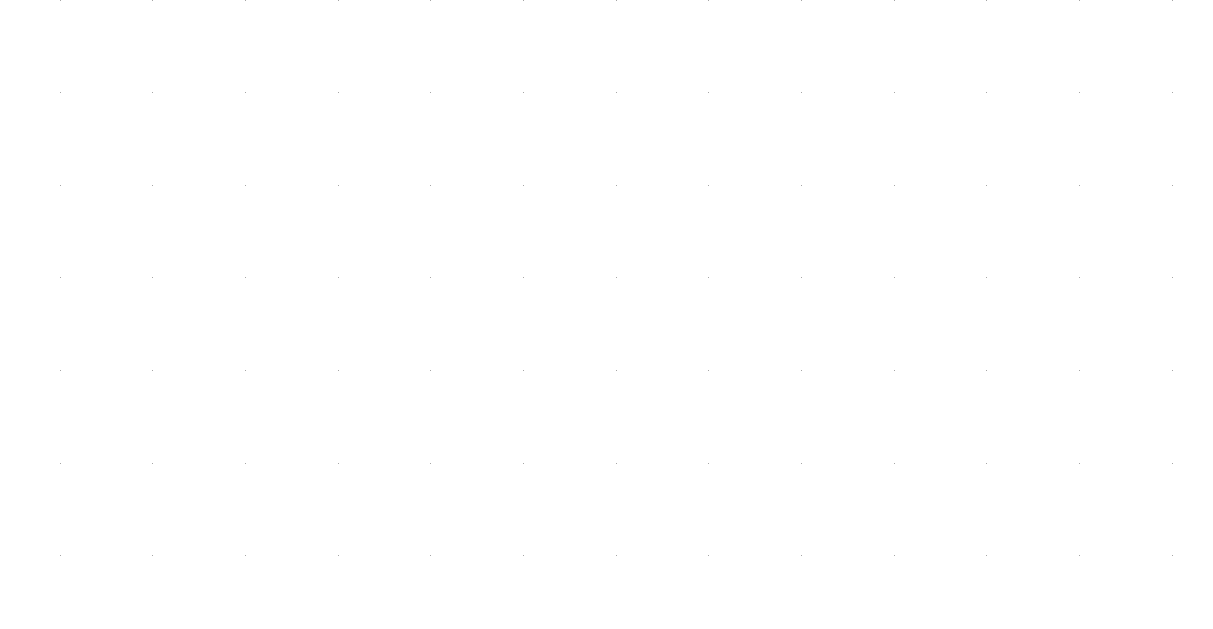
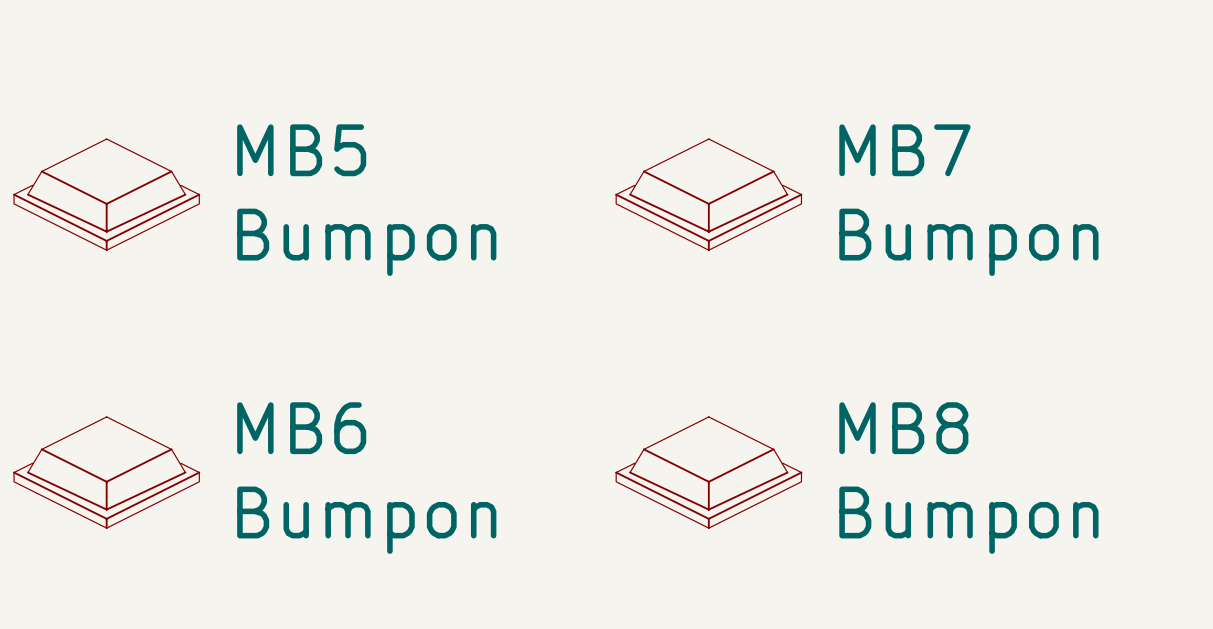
MB5: none -> Bumpon (106, 195)
MB7: none -> Bumpon (708, 195)
MB6: none -> Bumpon (106, 472)
MB8: none -> Bumpon (708, 472)

